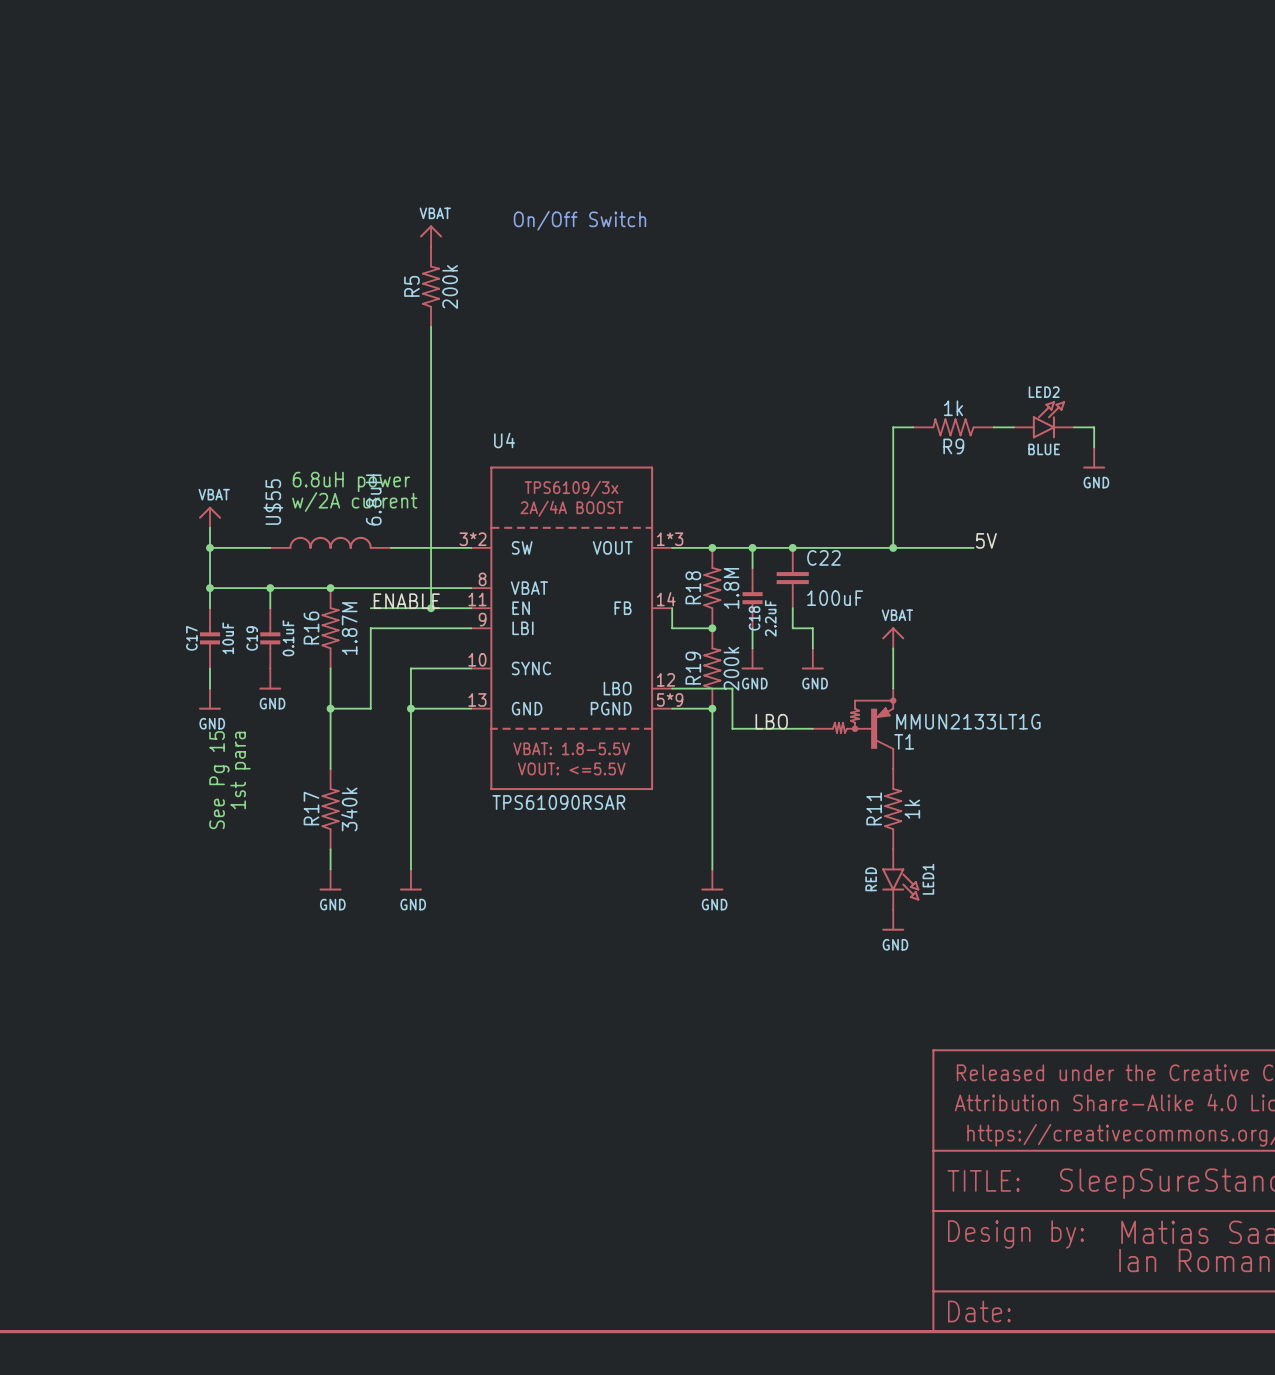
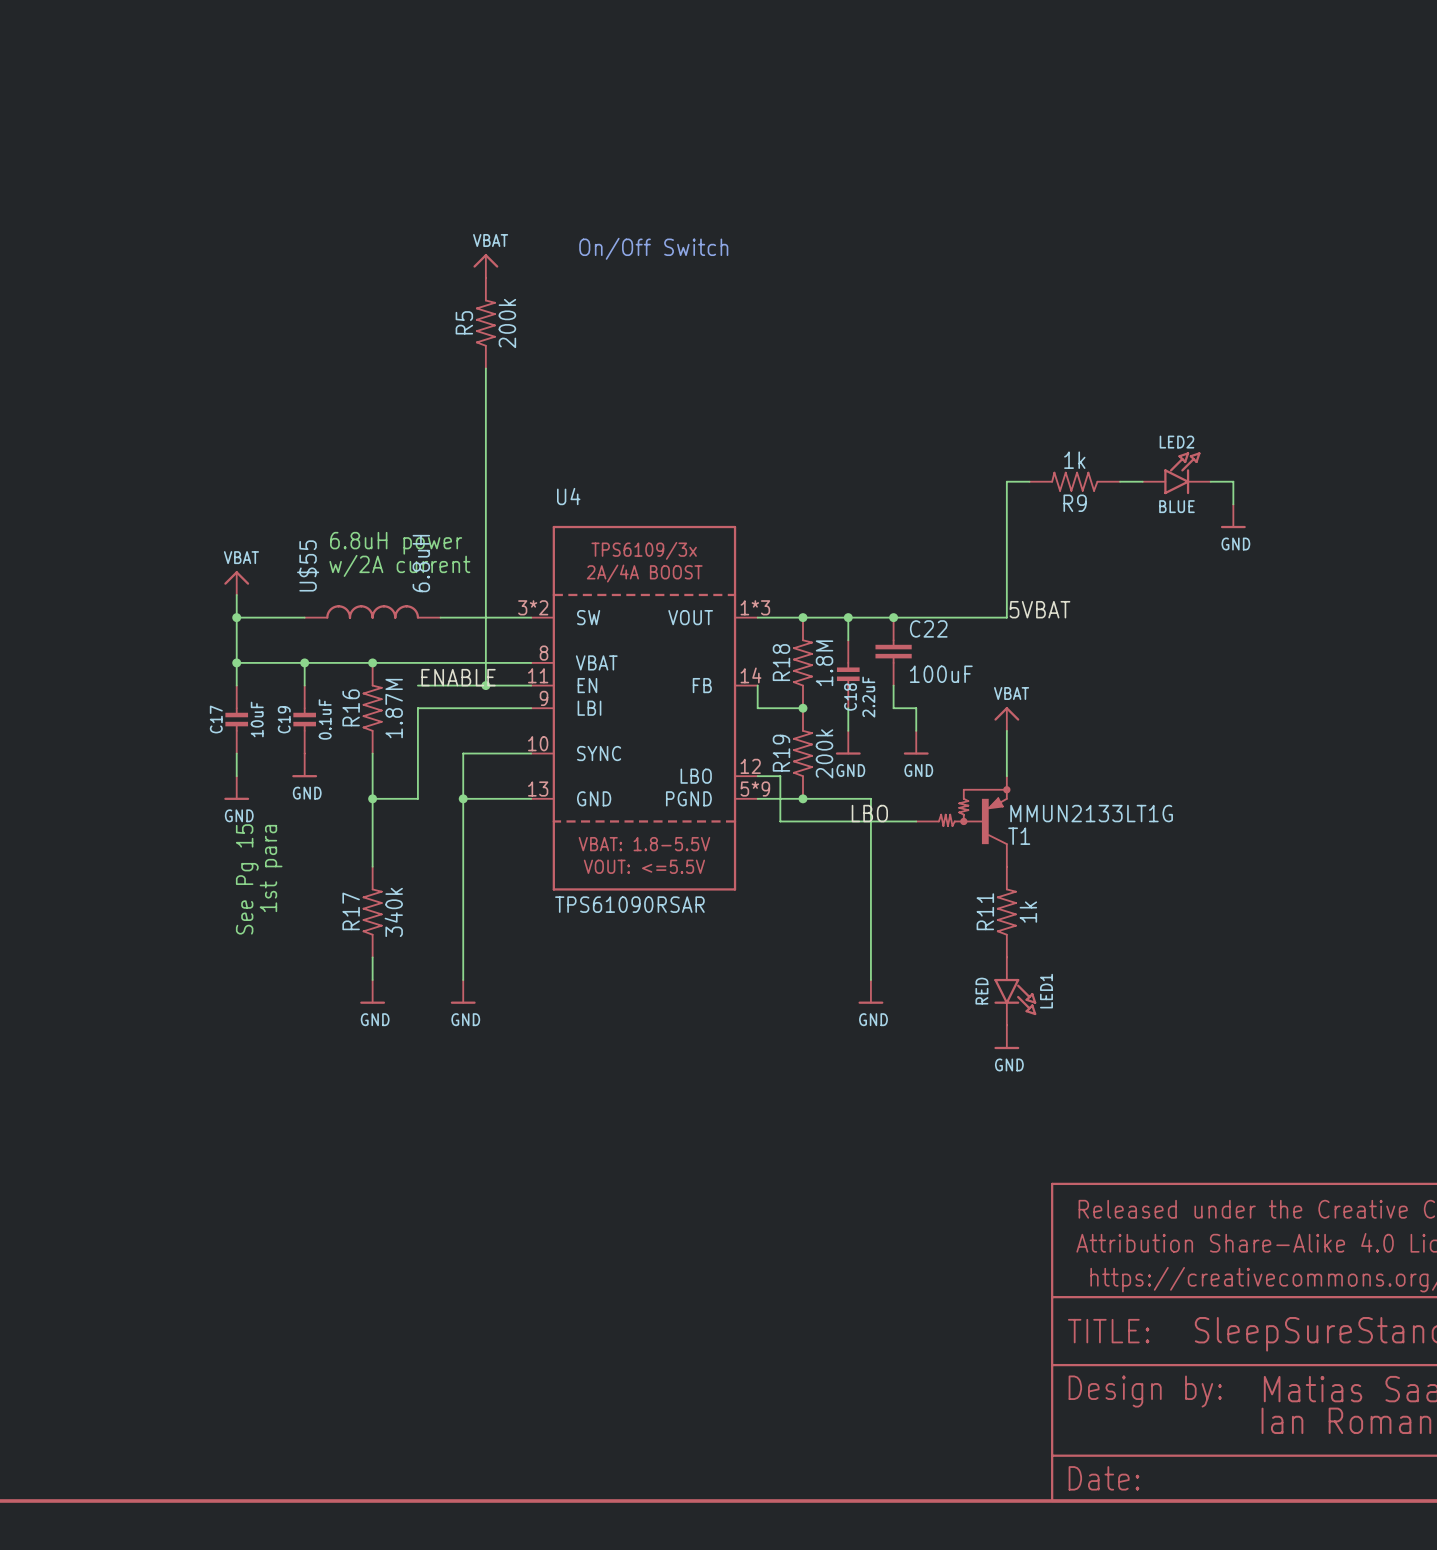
label: none -> 5VBAT (1039, 609)
label: 5V (986, 540) -> none
wire: (893, 547) (973, 547) -> none
junction: (893, 547) -> none
wire: (692, 688) (732, 688) (732, 728) -> (780, 776) (780, 821) (825, 821)
wire: (712, 708) (712, 869) -> (802, 798) (870, 798) (870, 980)
power symbol position: GND (712, 879) -> GND (870, 991)

